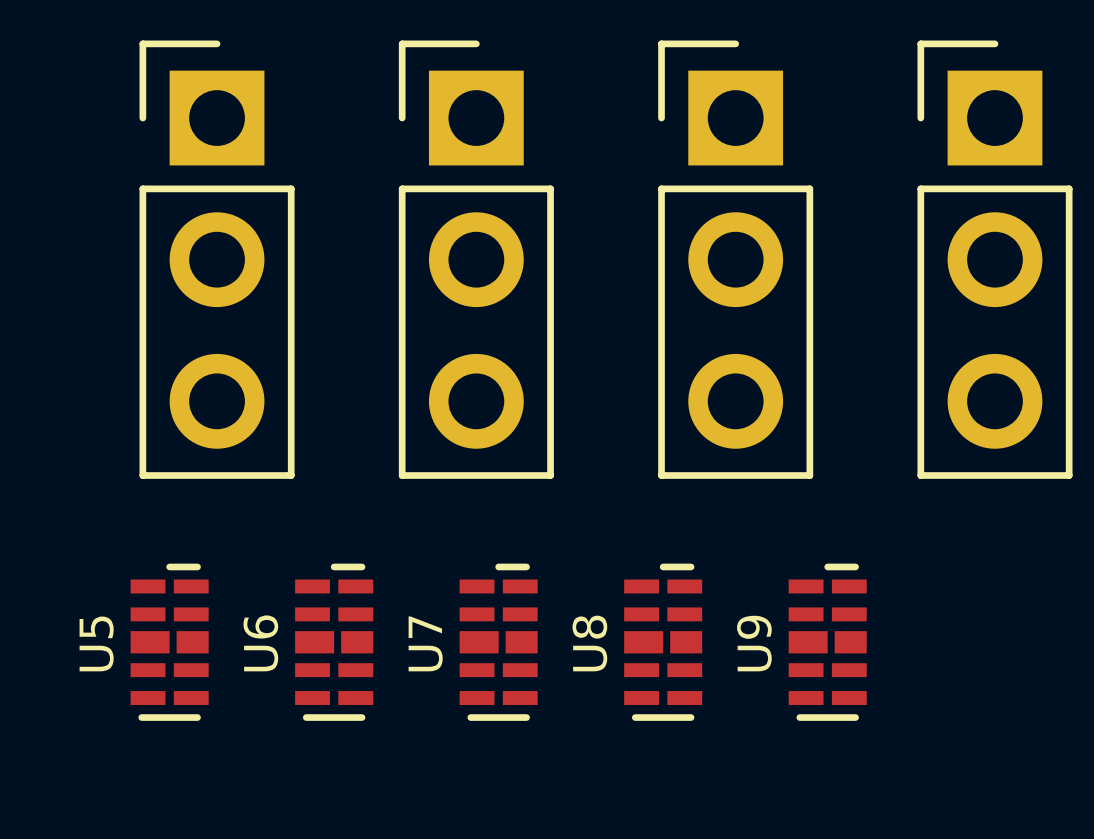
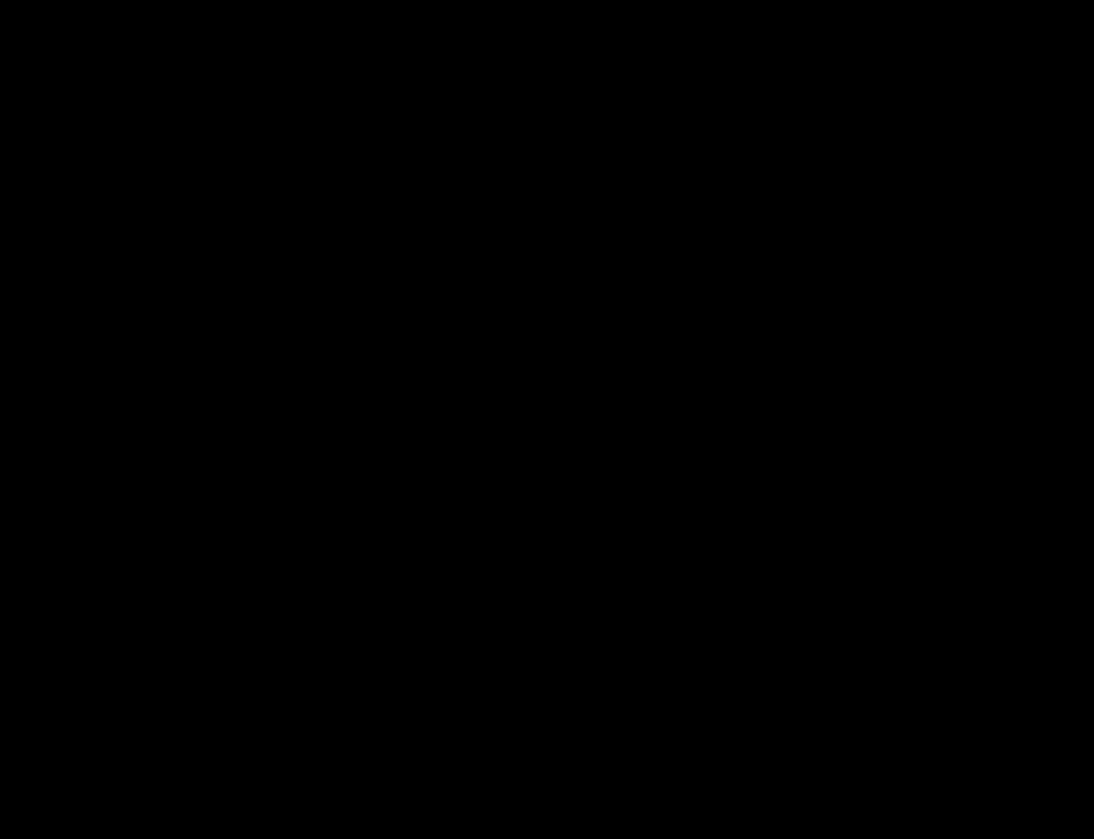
part: (217, 259) -> none
part: (476, 259) -> none
part: (735, 259) -> none
part: (994, 259) -> none
U5: (169, 642) -> none
U6: (334, 642) -> none
U7: (498, 642) -> none
U8: (663, 642) -> none
U9: (827, 642) -> none

